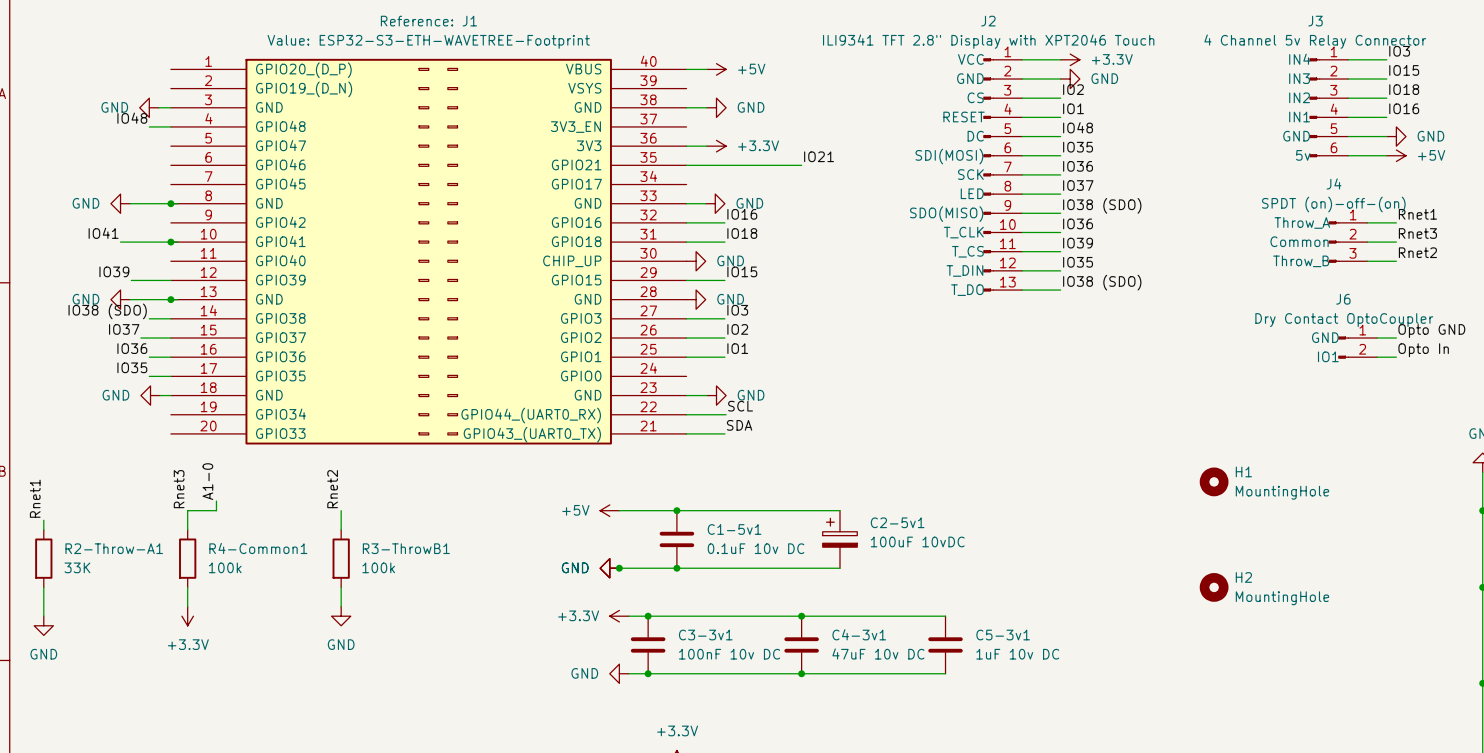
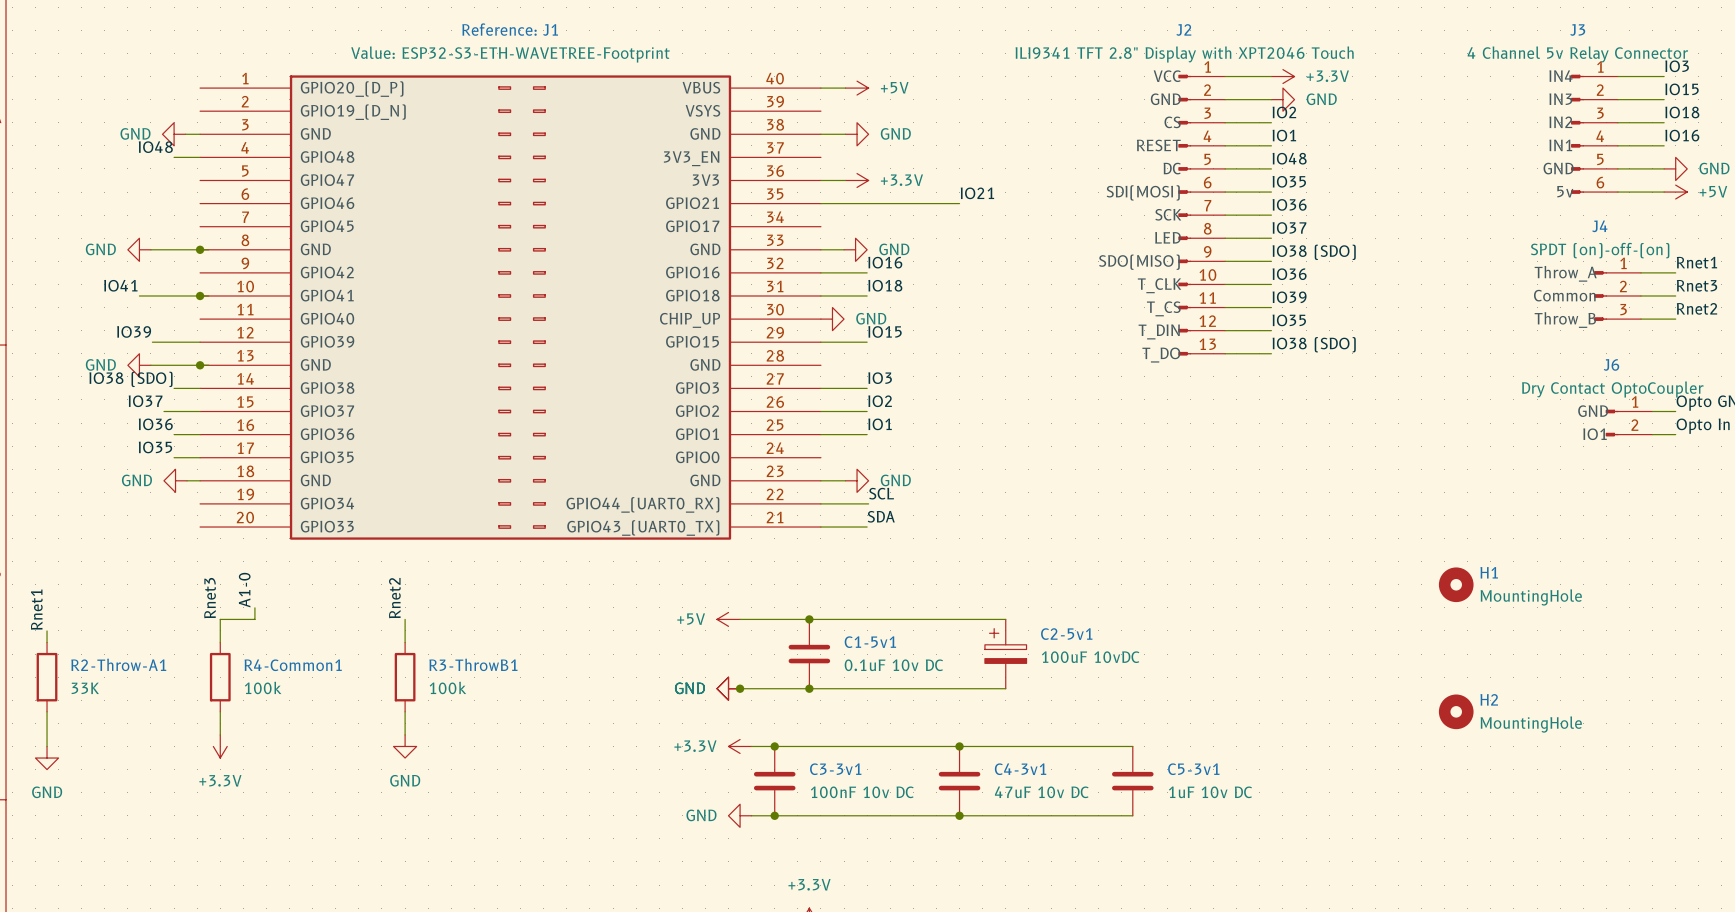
power symbol: GND (696, 299) -> none

